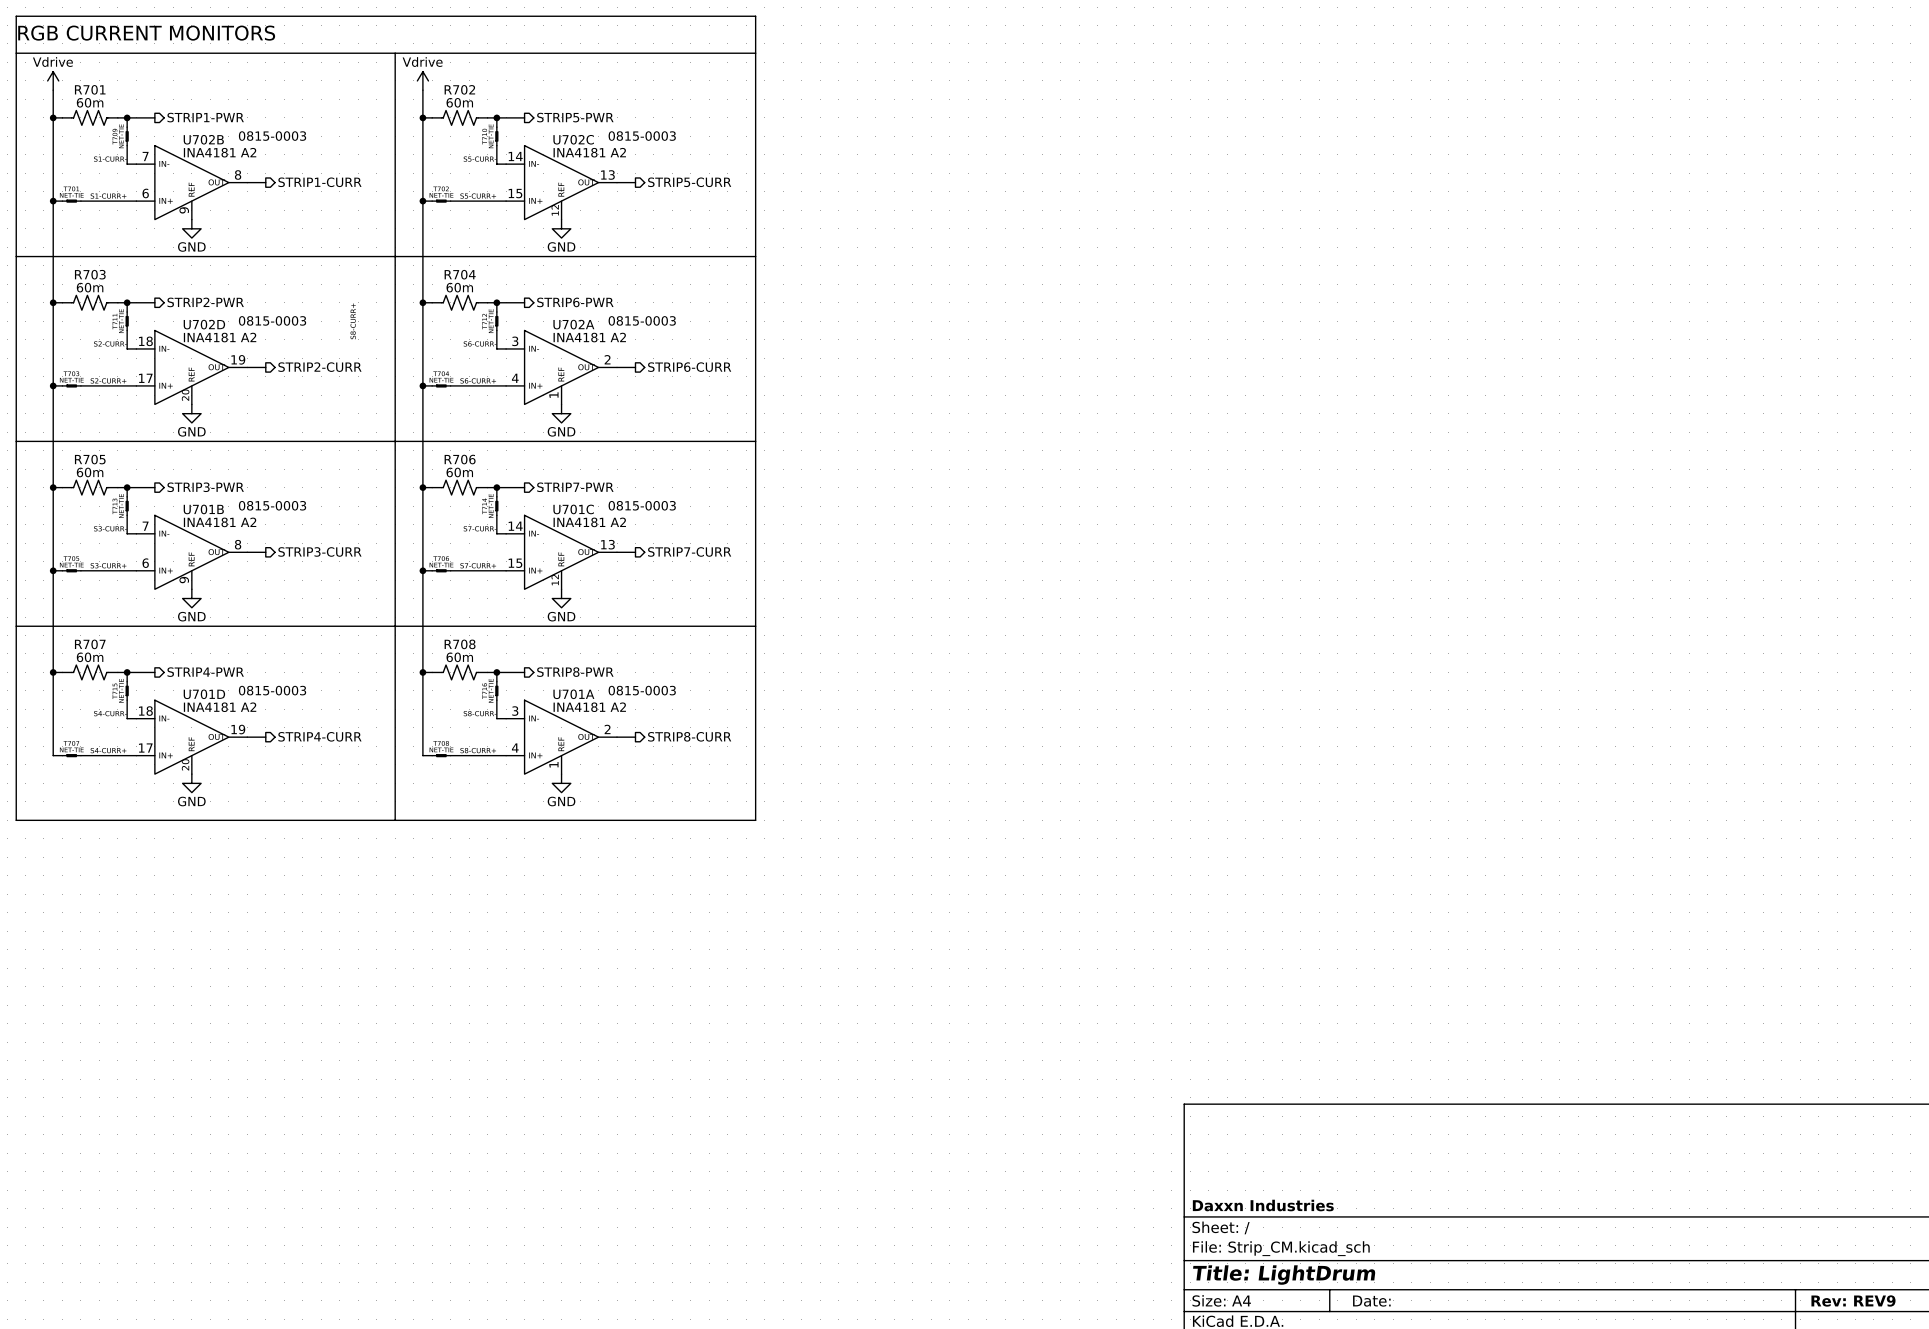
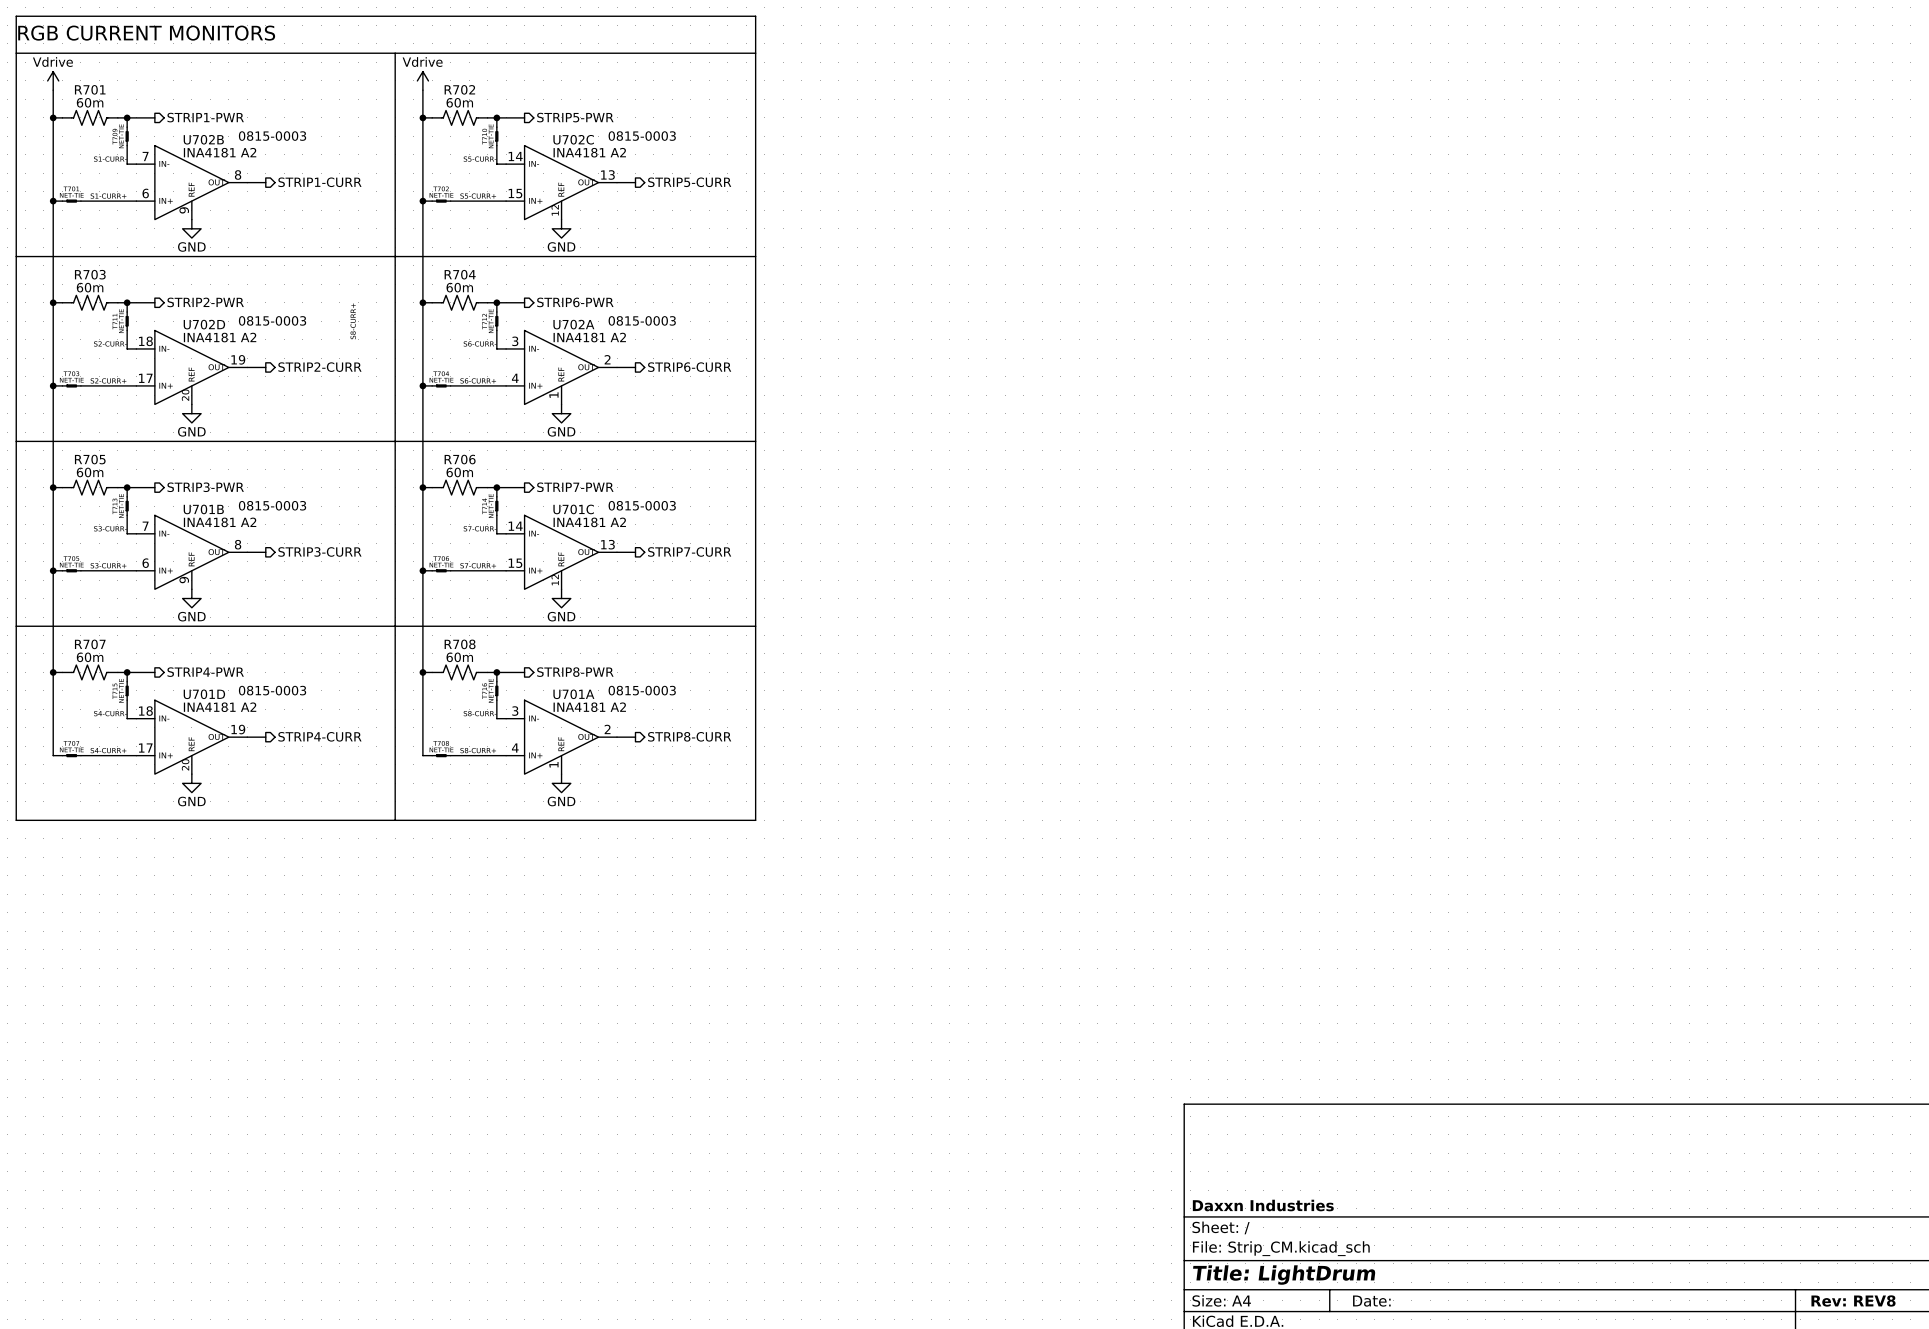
title block: Rev: REV9 (1853, 1300) -> Rev: REV8 (1853, 1300)

